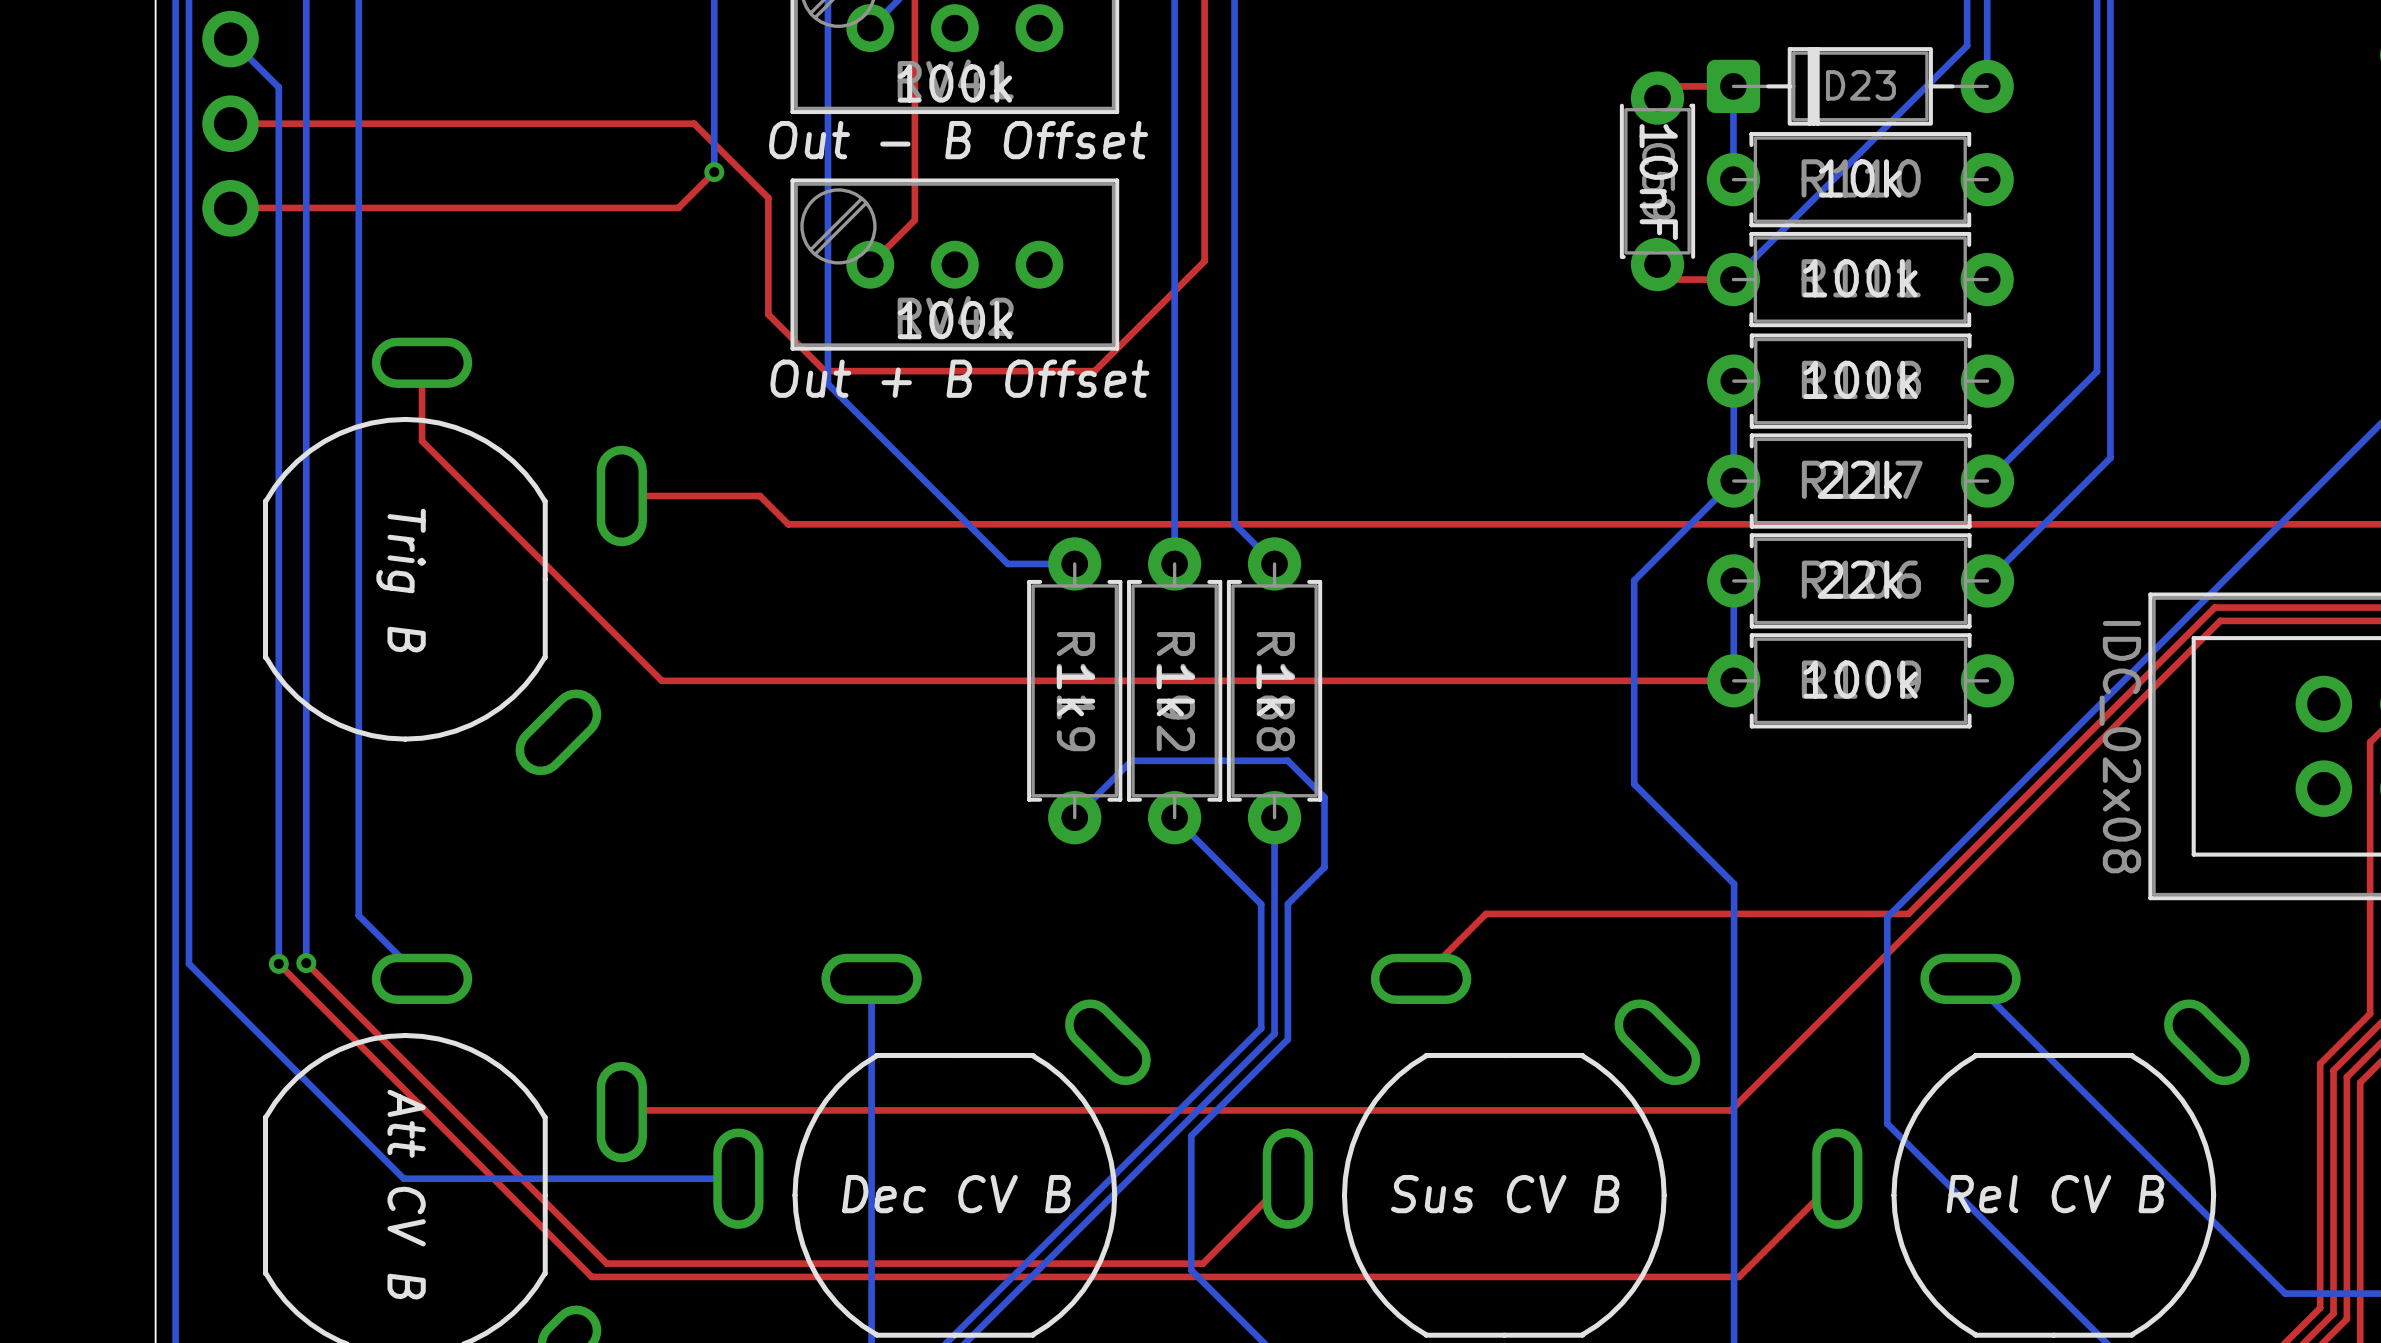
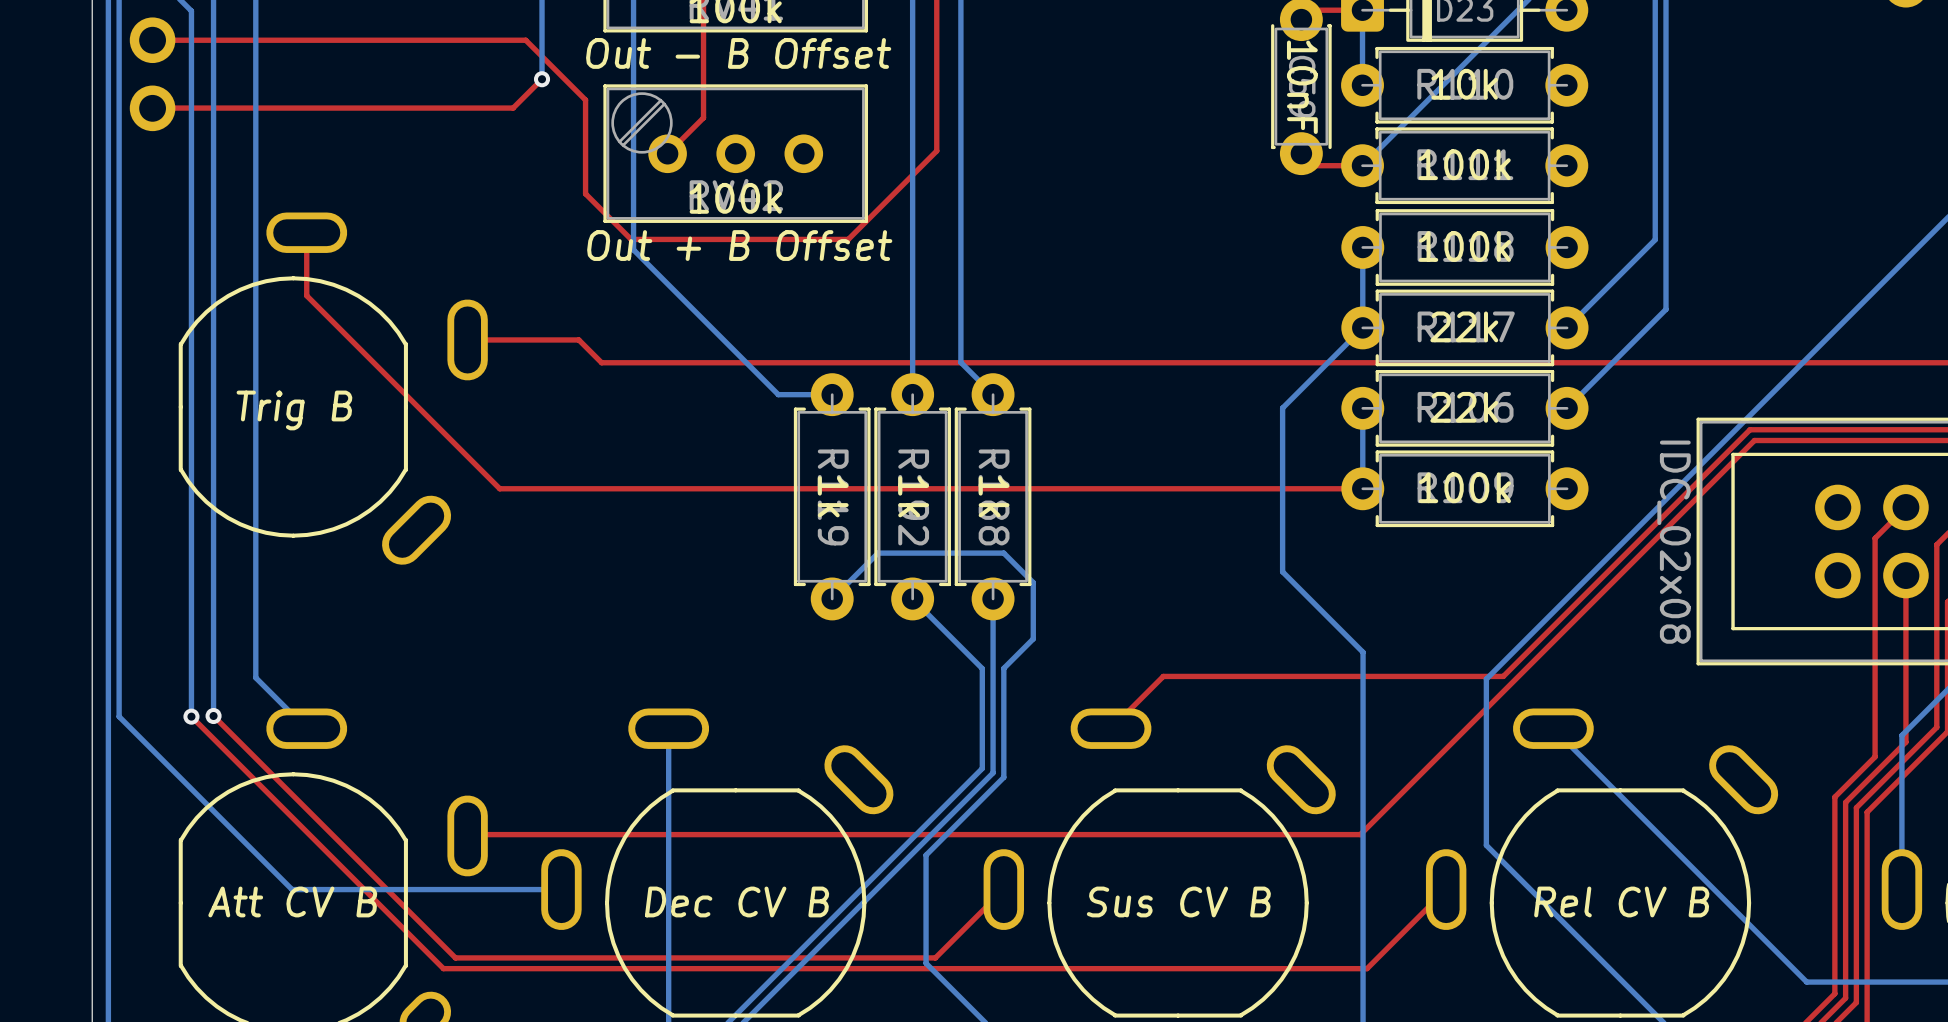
part text rotation: 0° (401, 580) -> 90° counterclockwise (294, 410)
part text rotation: 0° (406, 1194) -> 90° counterclockwise (292, 901)

